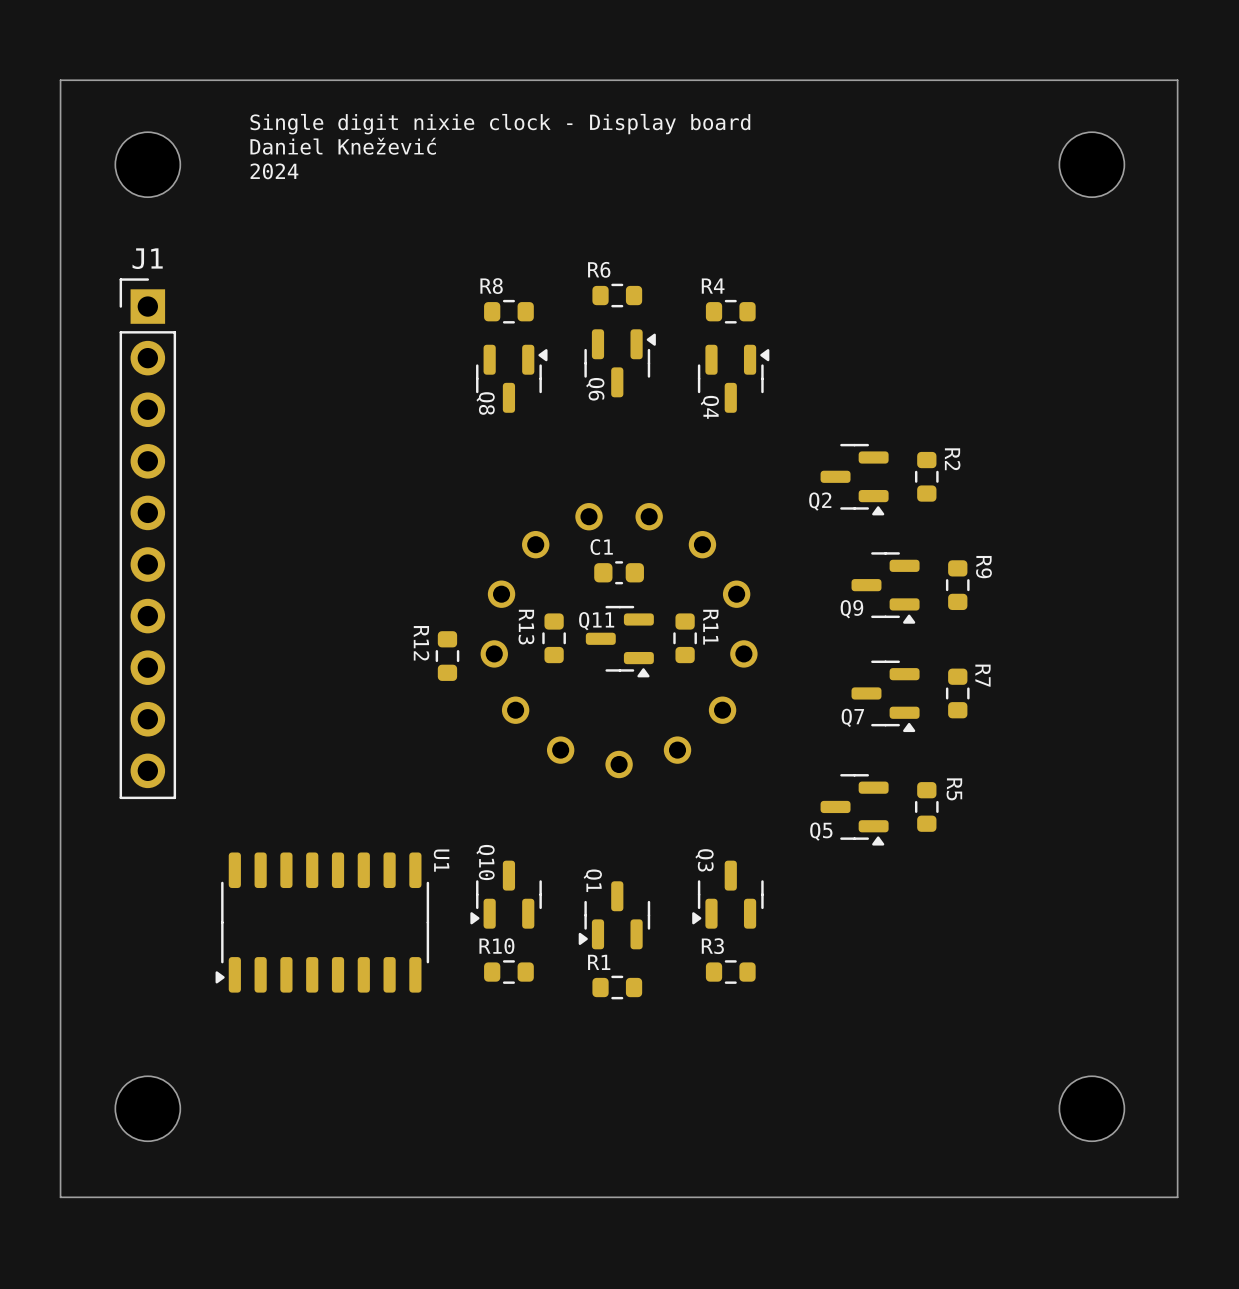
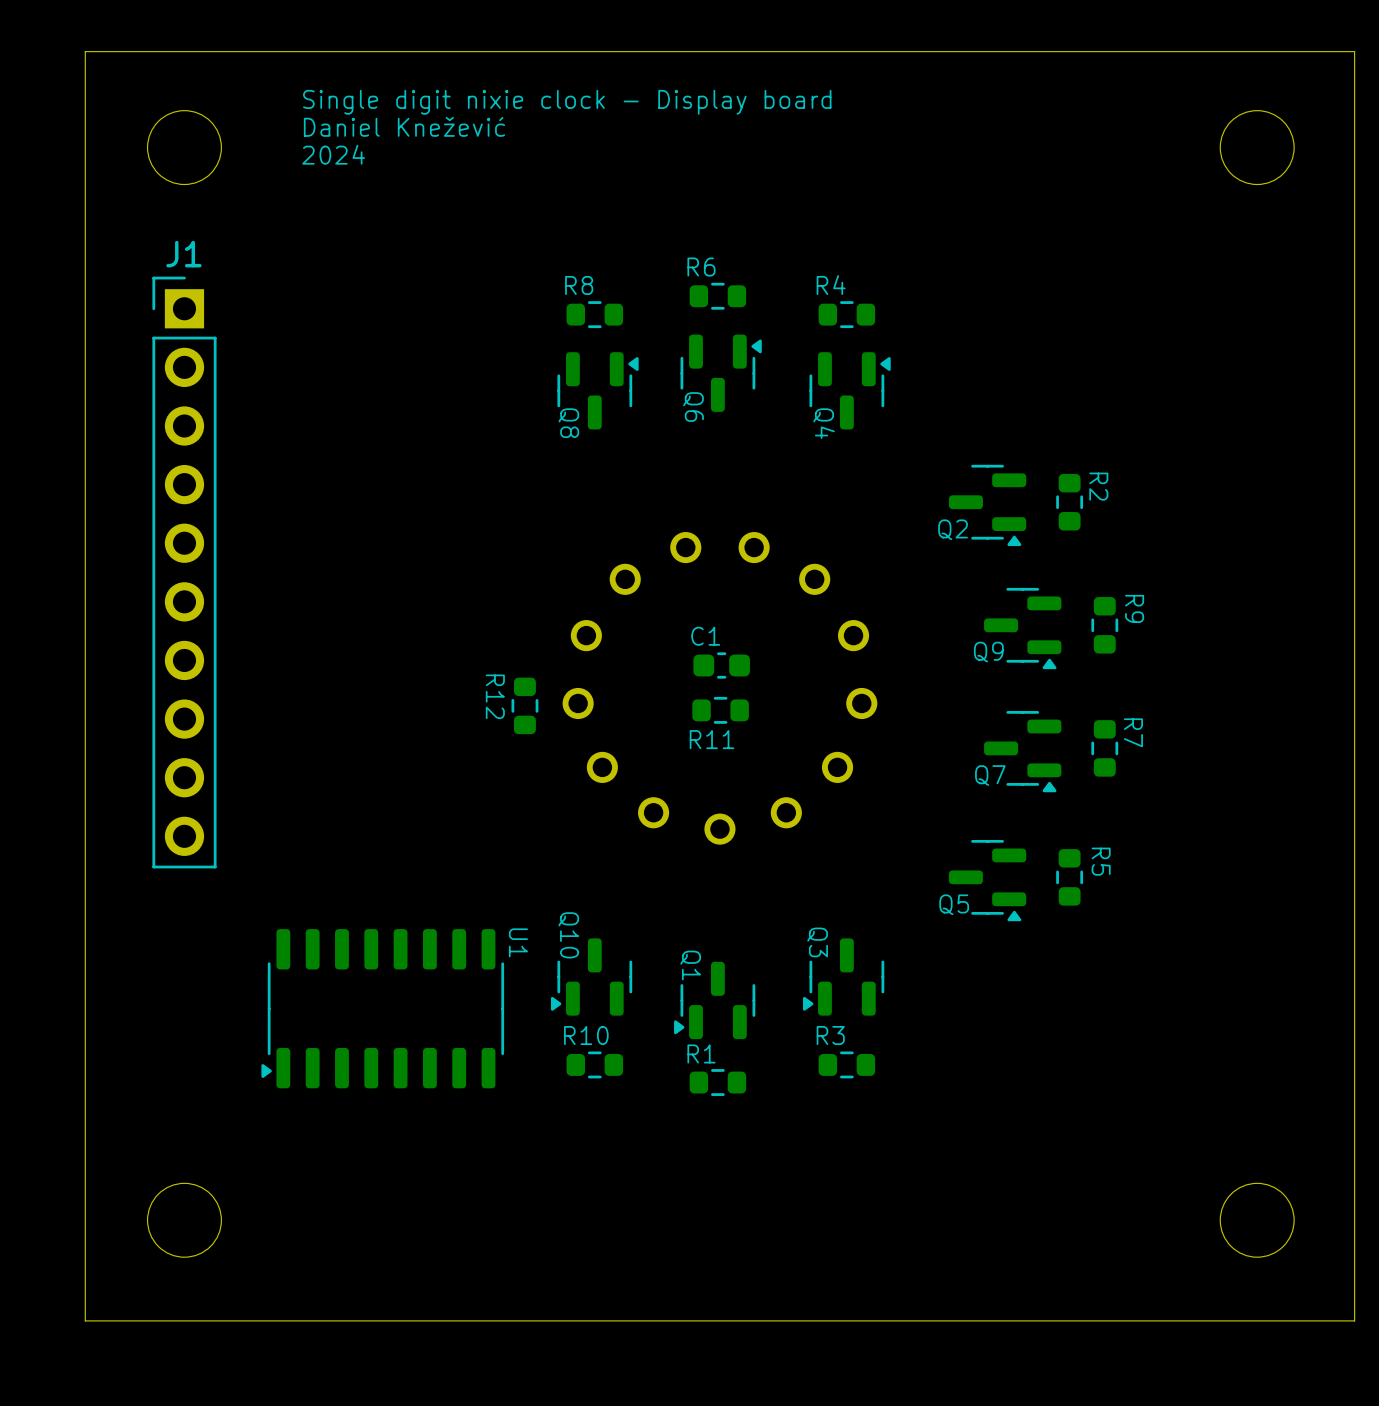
C1 position: (619, 572) -> (721, 665)
R13: (554, 638) -> none
R11 rotation: 0° (685, 638) -> 90° clockwise (720, 710)
R11 position: (685, 638) -> (720, 710)
Q11: (619, 641) -> none

